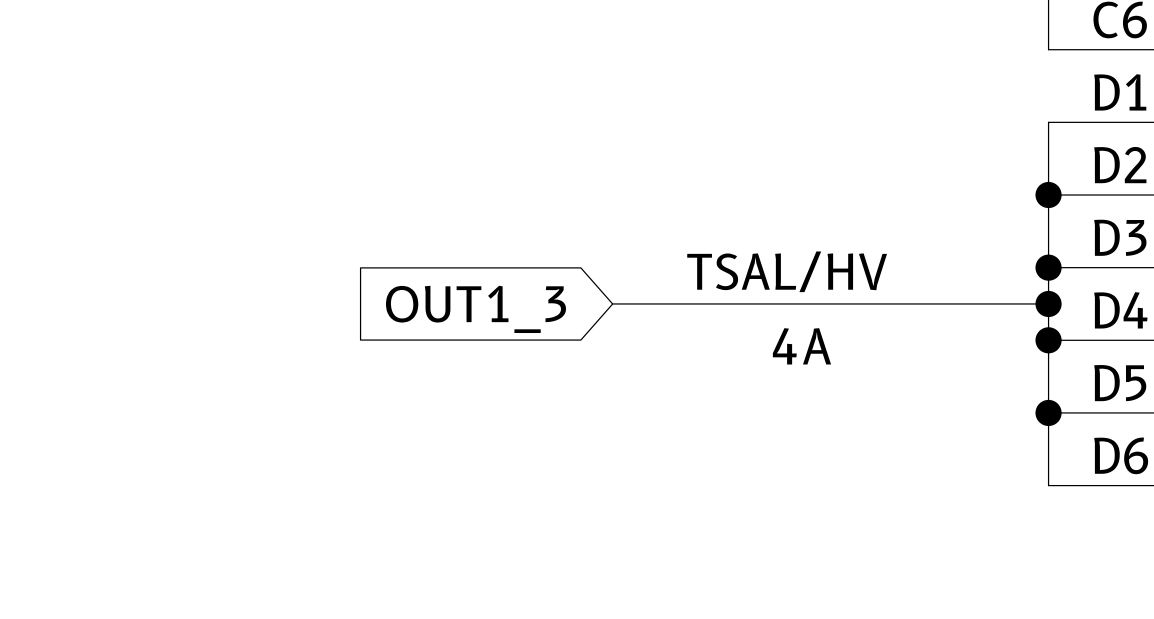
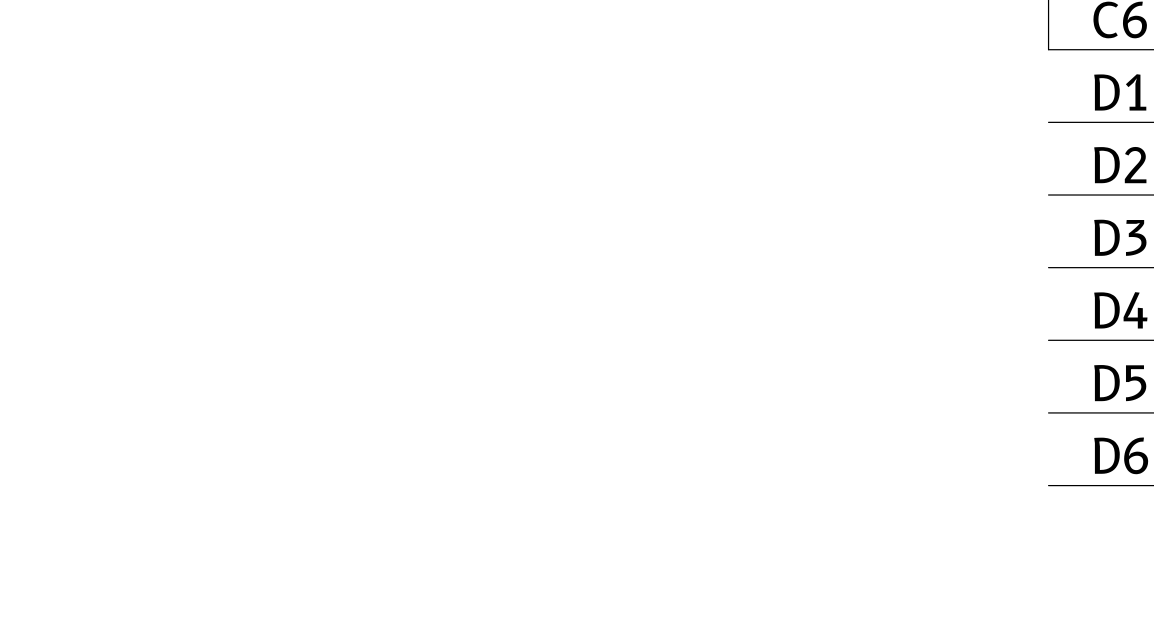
wire: (1048, 122) (1048, 485) -> none
junction: (1048, 195) -> none
junction: (1048, 267) -> none
label: TSAL/HV (787, 271) -> none
wire: (612, 303) (1048, 303) -> none
junction: (1048, 303) -> none
global label: OUT1_3 (475, 309) -> none
junction: (1048, 340) -> none
text: 4A (801, 346) -> none
junction: (1048, 412) -> none

